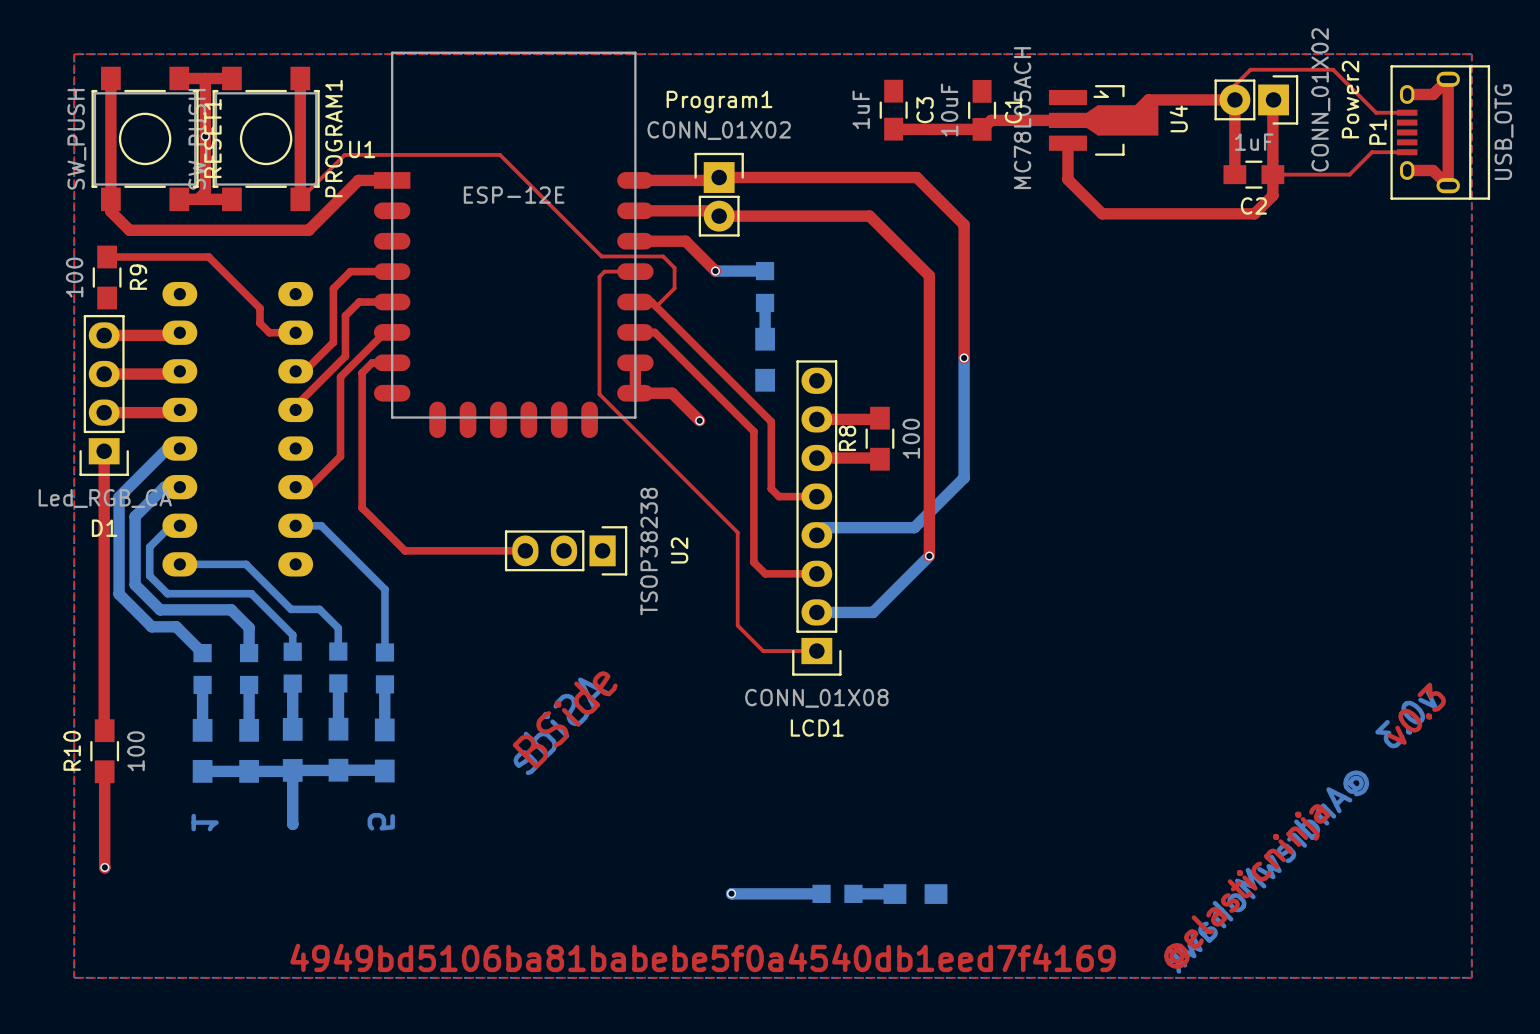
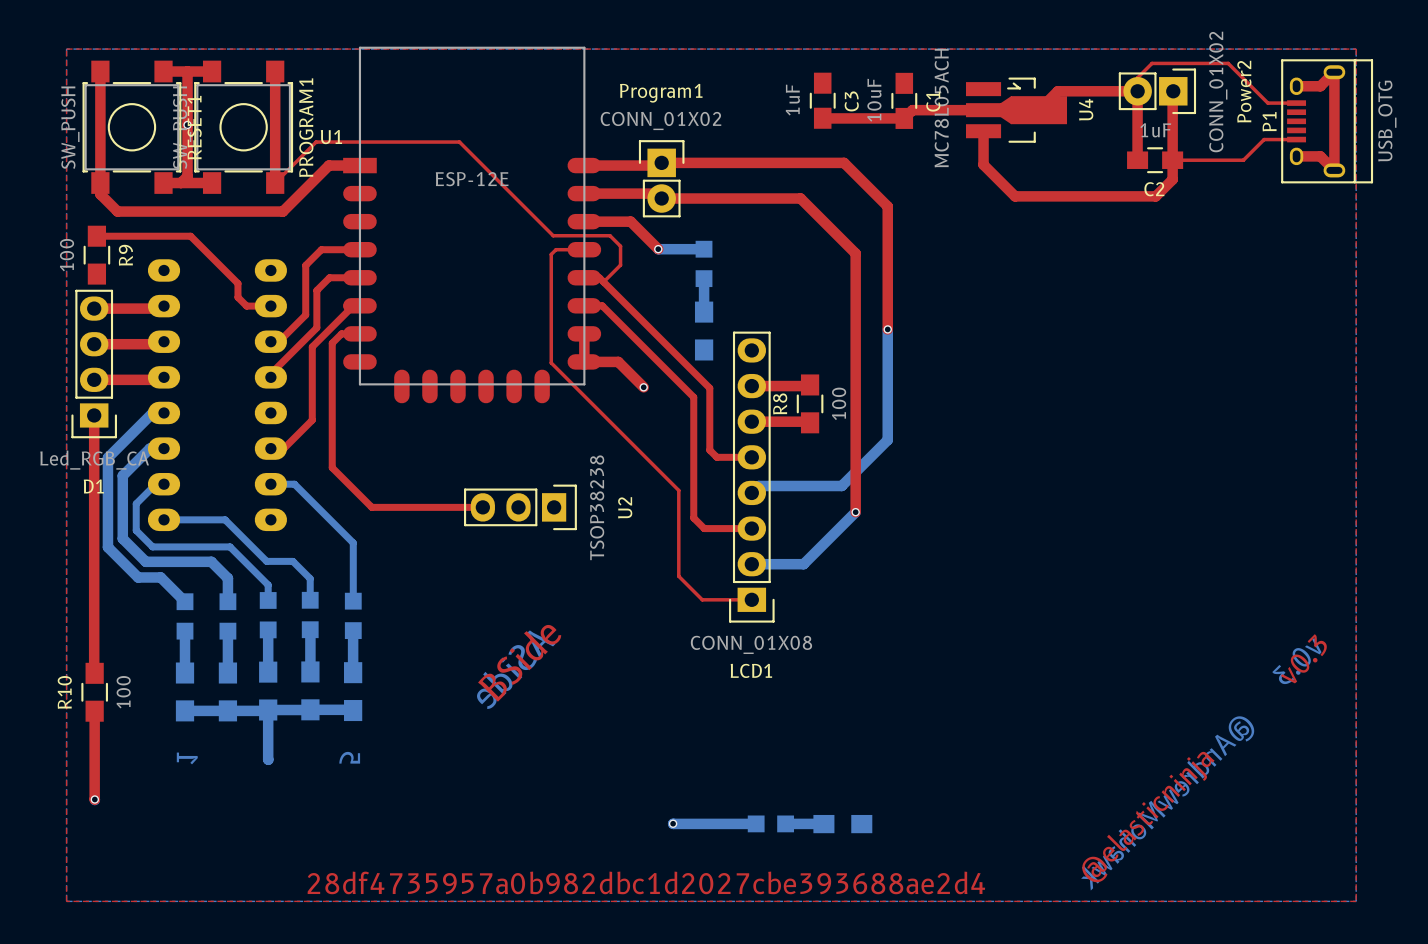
text: 4949bd5106ba81babebe5f0a4540db1eed7f4169 (702, 957) -> 28df4735957a0b982dbc1d2027cbe393688ae2d4 (646, 882)

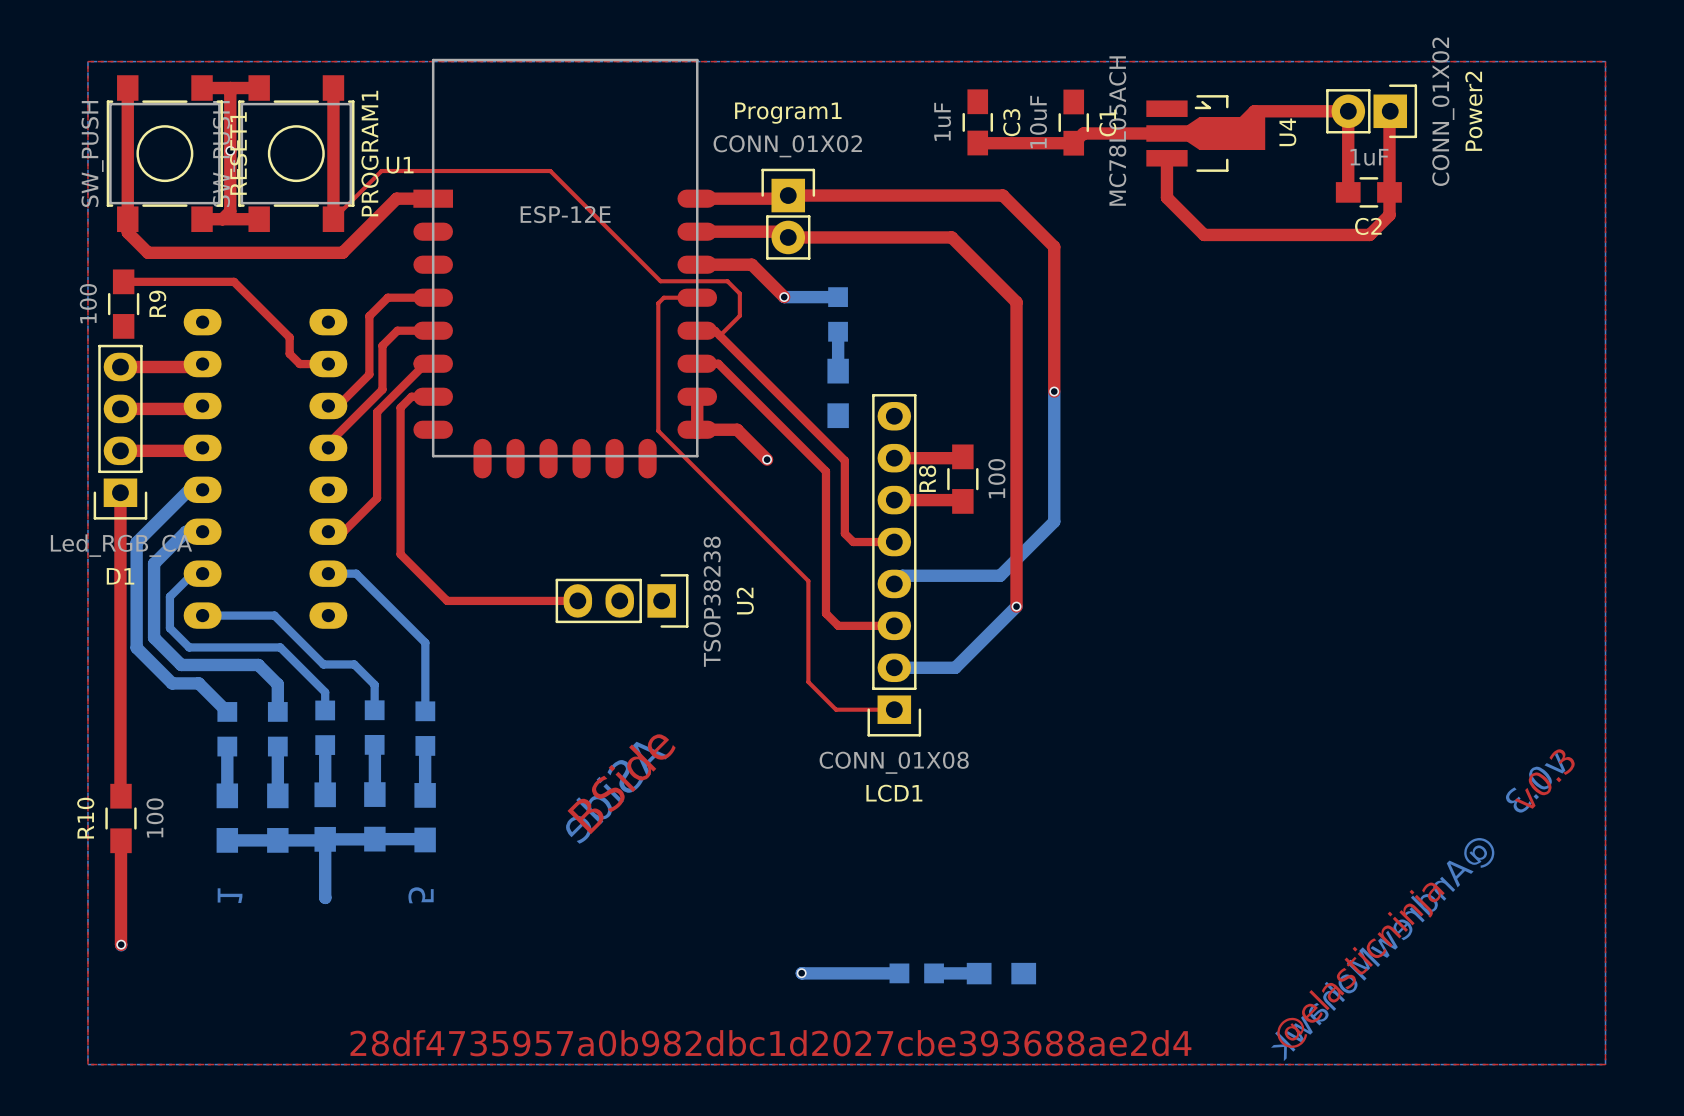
top track: (1296, 86) (1320, 86) (1334, 72) (1334, 170) (1320, 156) (1296, 156) -> none
top track: (1137, 91) (1137, 77) (1152, 63) (1228, 63) (1267, 103) (1296, 103) -> none
P1: USB_OTG (1327, 121) -> none
top track: (1296, 139) (1264, 139) (1243, 160) (1172, 160) -> none

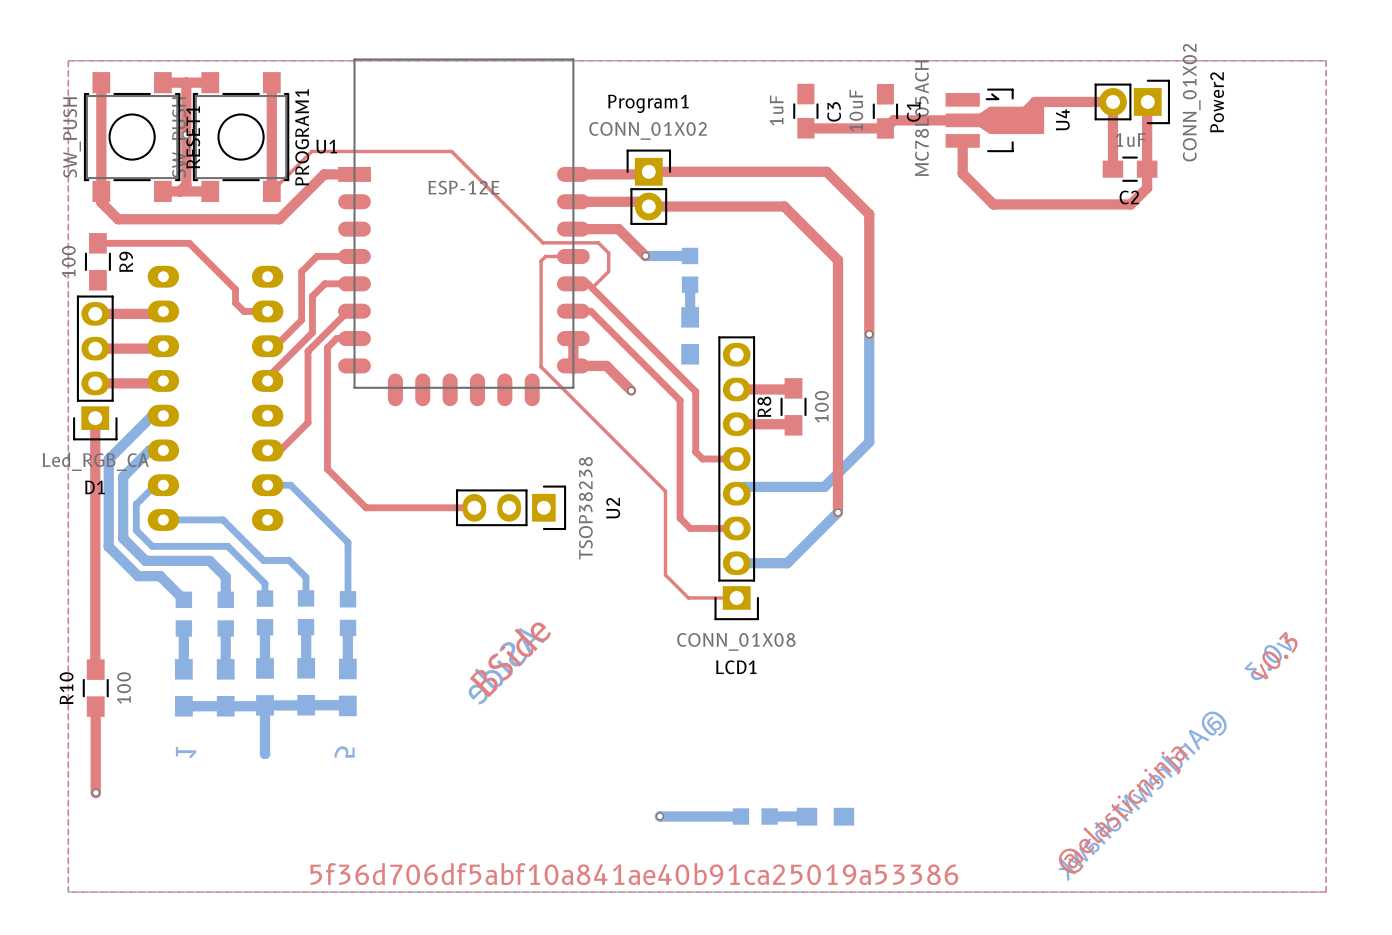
text: 28df4735957a0b982dbc1d2027cbe393688ae2d4 (770, 1043) -> 5f36d706df5abf10a841ae40b91ca25019a53386 (634, 874)

